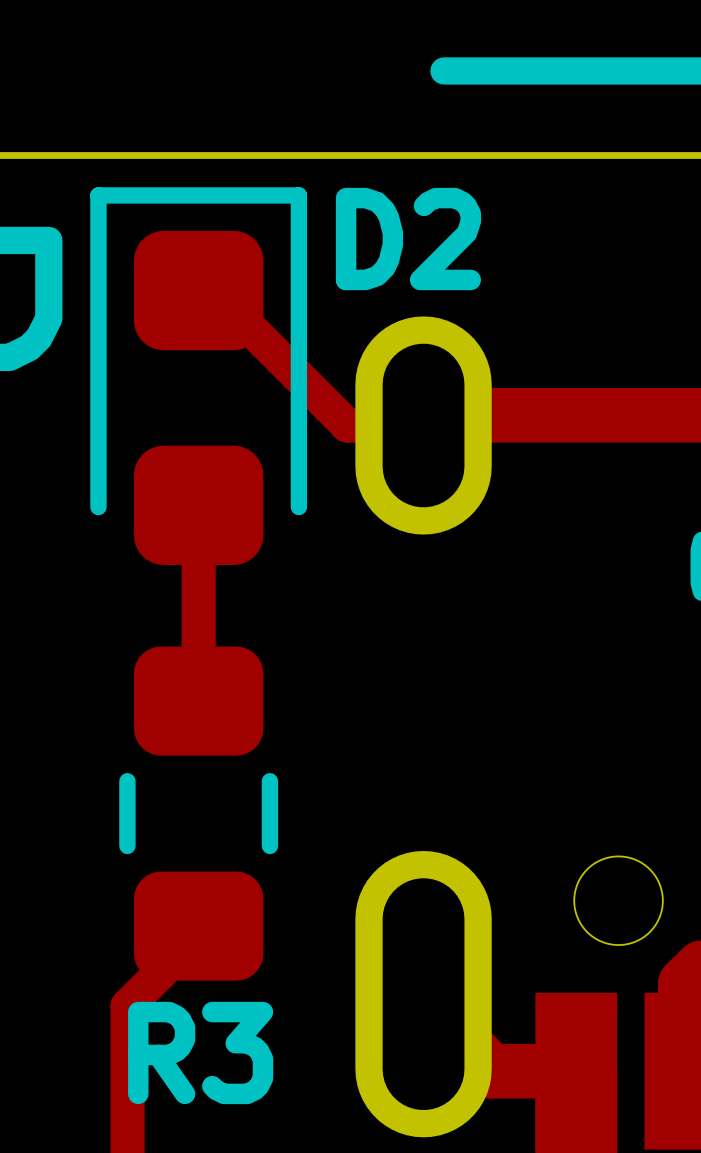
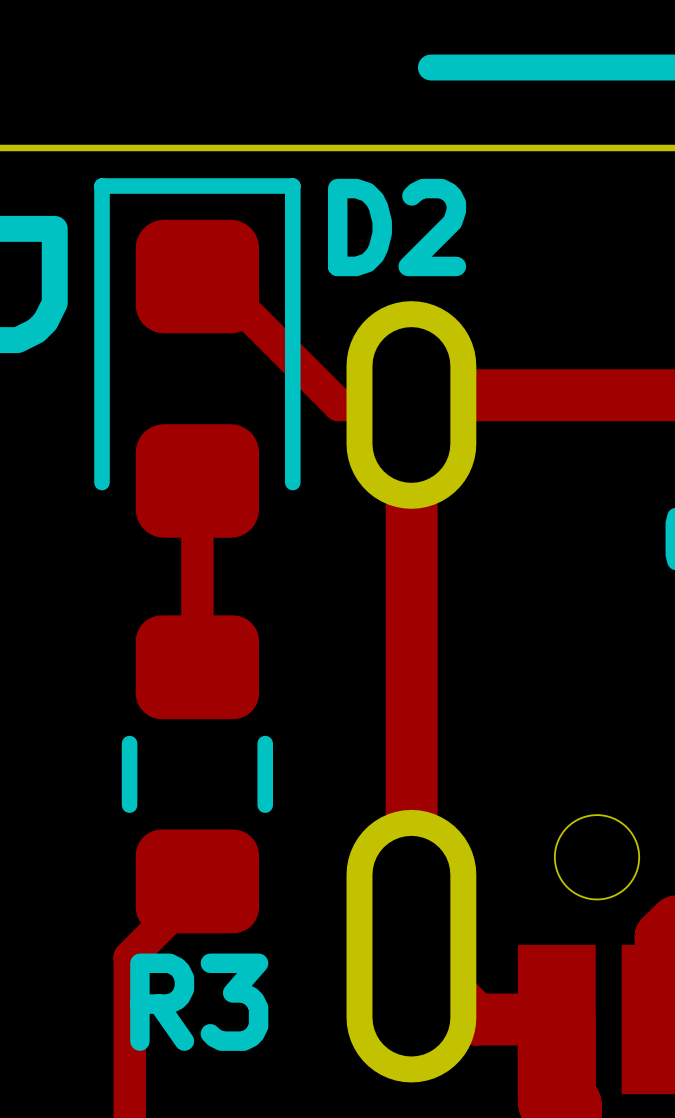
track: none -> (411, 395) (411, 955)

